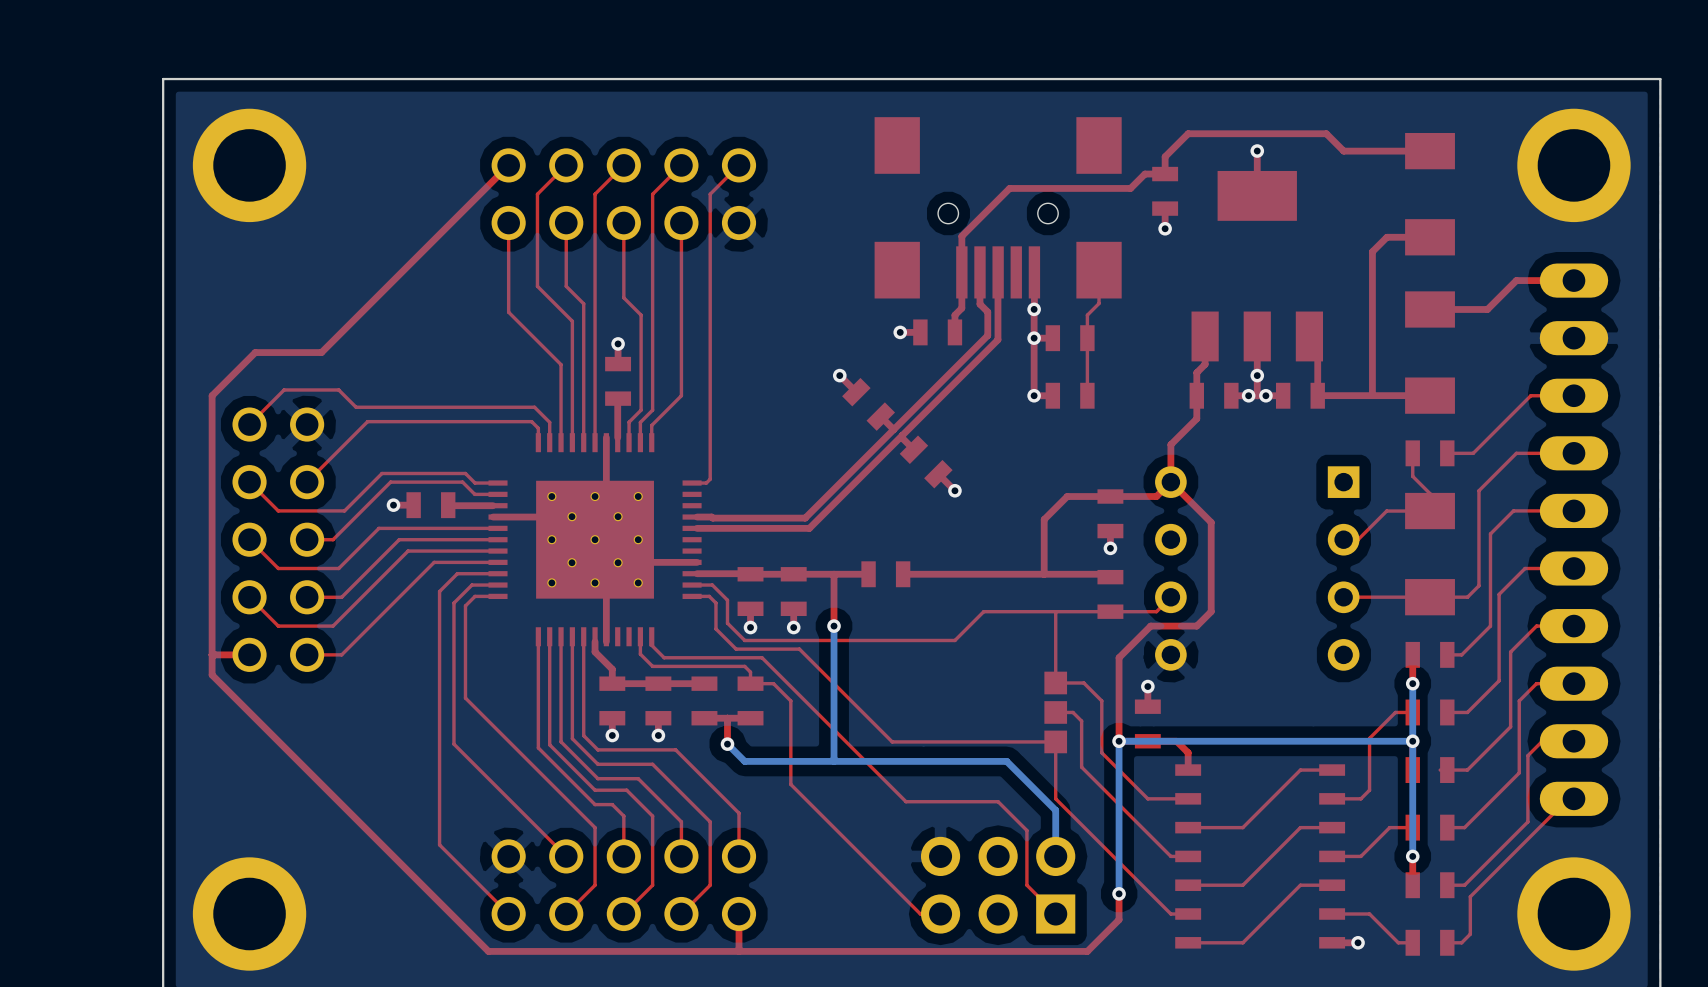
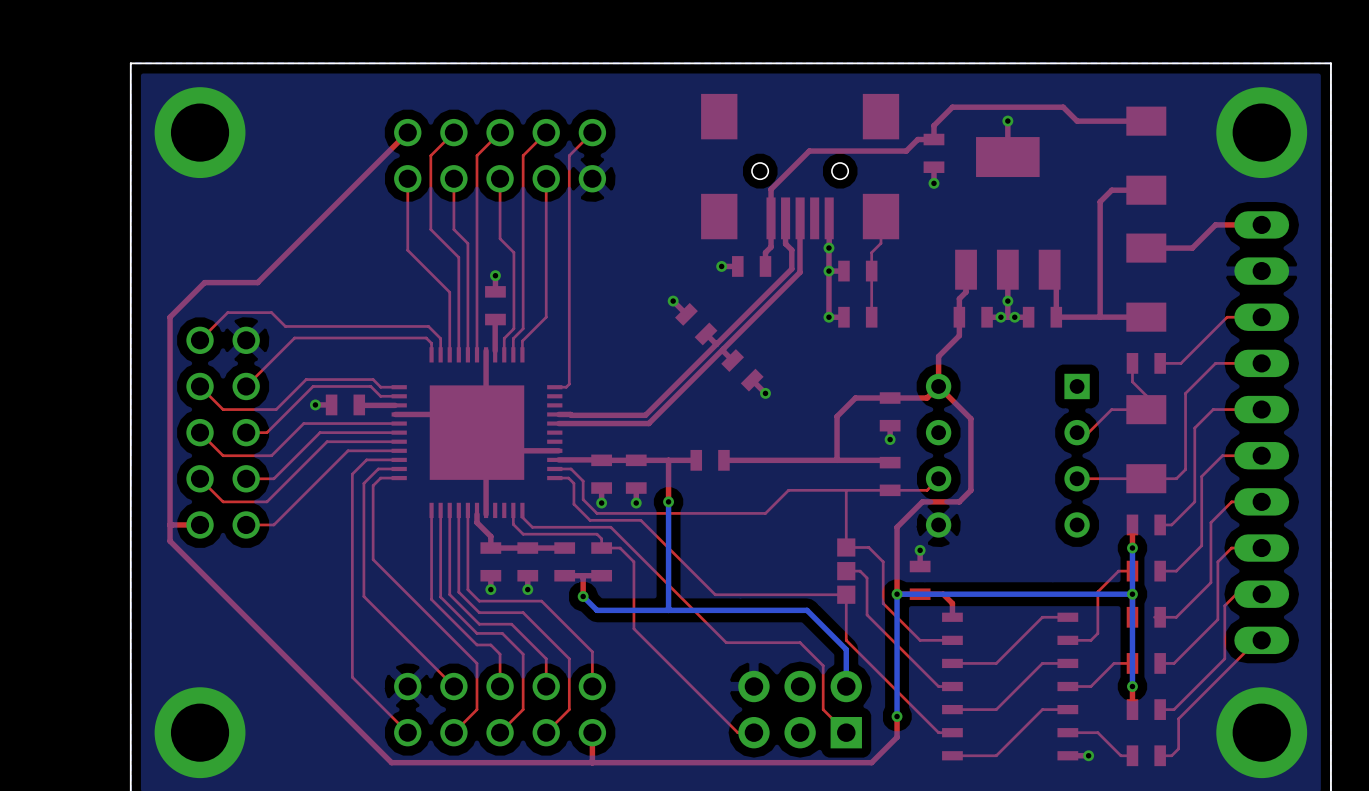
part footprint: [488, 433, 702, 647] -> [391, 347, 563, 519]

